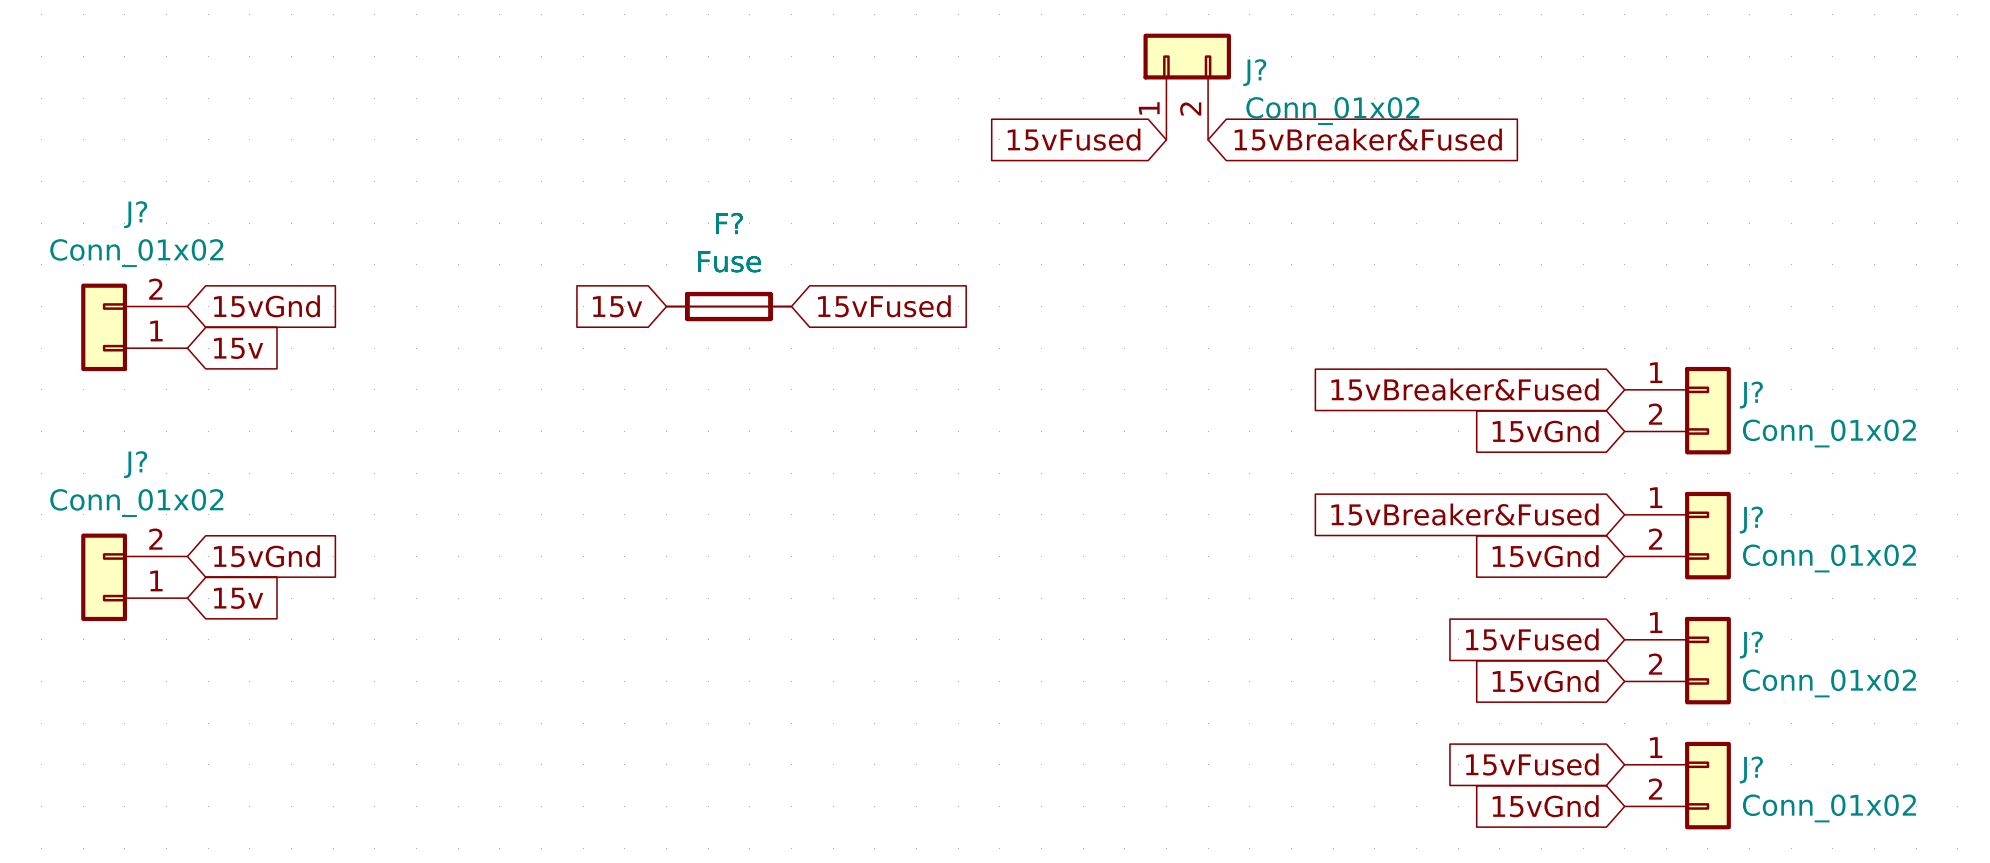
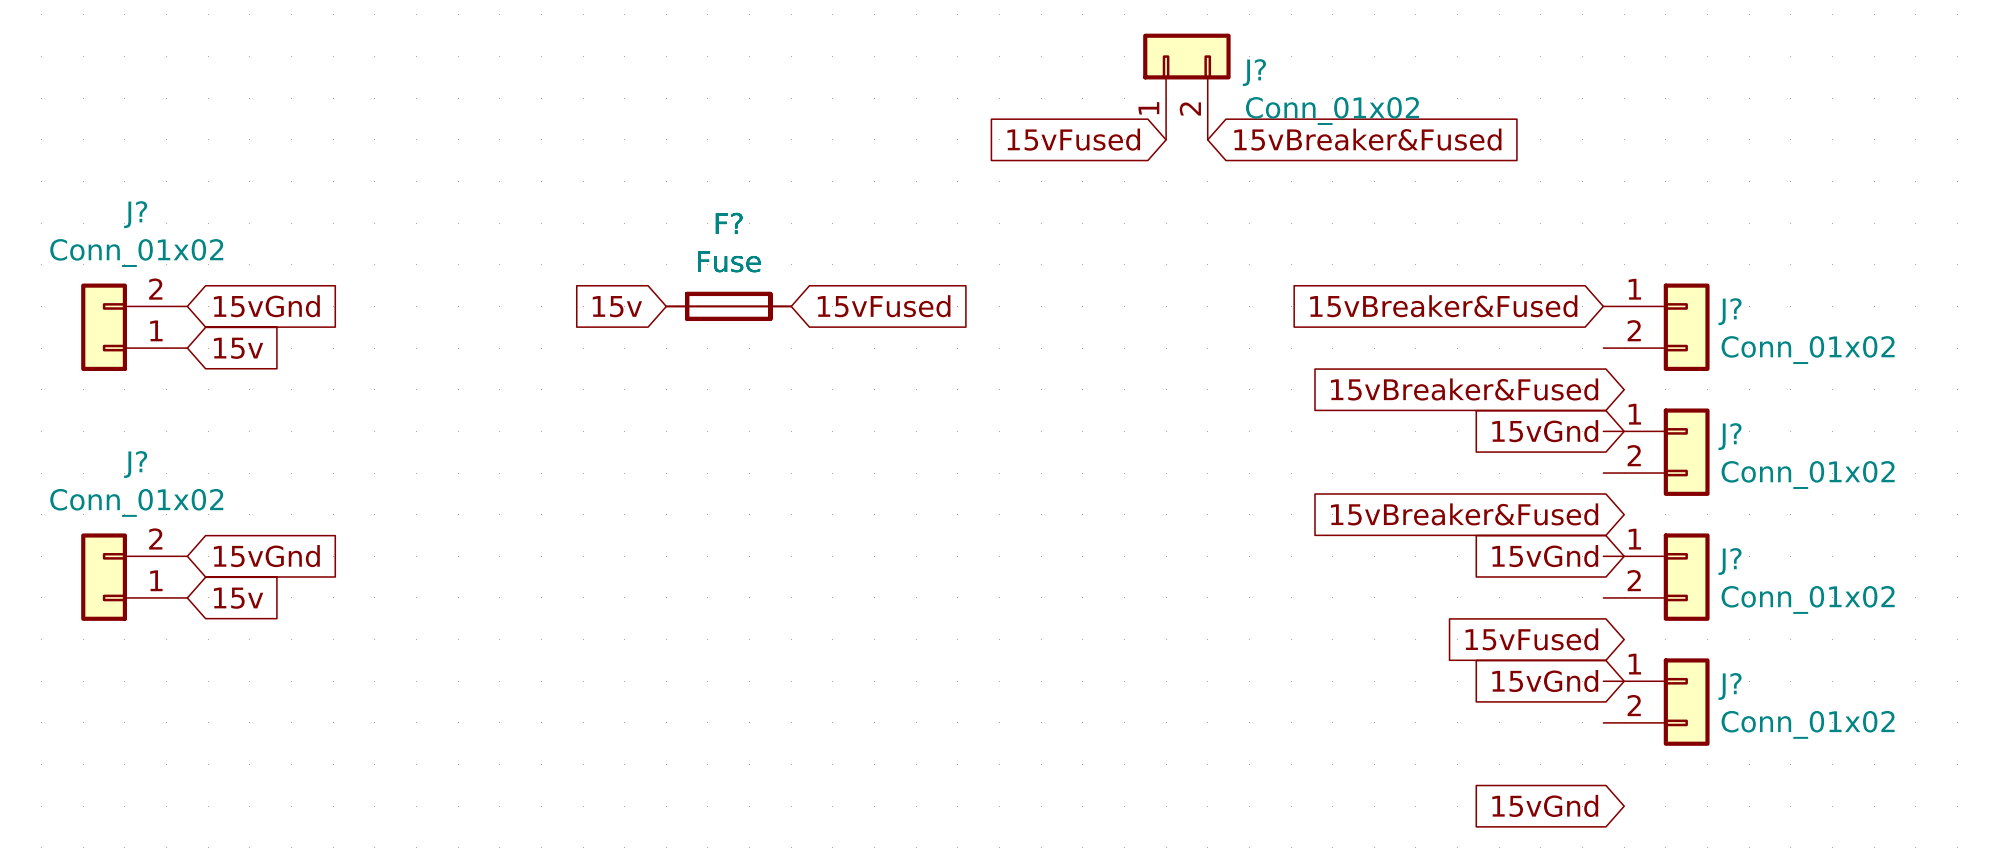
global label: none -> 15vBreaker&Fused (1443, 306)
J?: none -> Conn_01x02 (1656, 327)
J?: Conn_01x02 (1677, 410) -> none
J?: none -> Conn_01x02 (1656, 452)
J?: Conn_01x02 (1677, 535) -> none
J?: none -> Conn_01x02 (1656, 577)
J?: Conn_01x02 (1677, 660) -> none
J?: none -> Conn_01x02 (1656, 702)
global label: 15vFused (1532, 764) -> none
J?: Conn_01x02 (1677, 785) -> none

